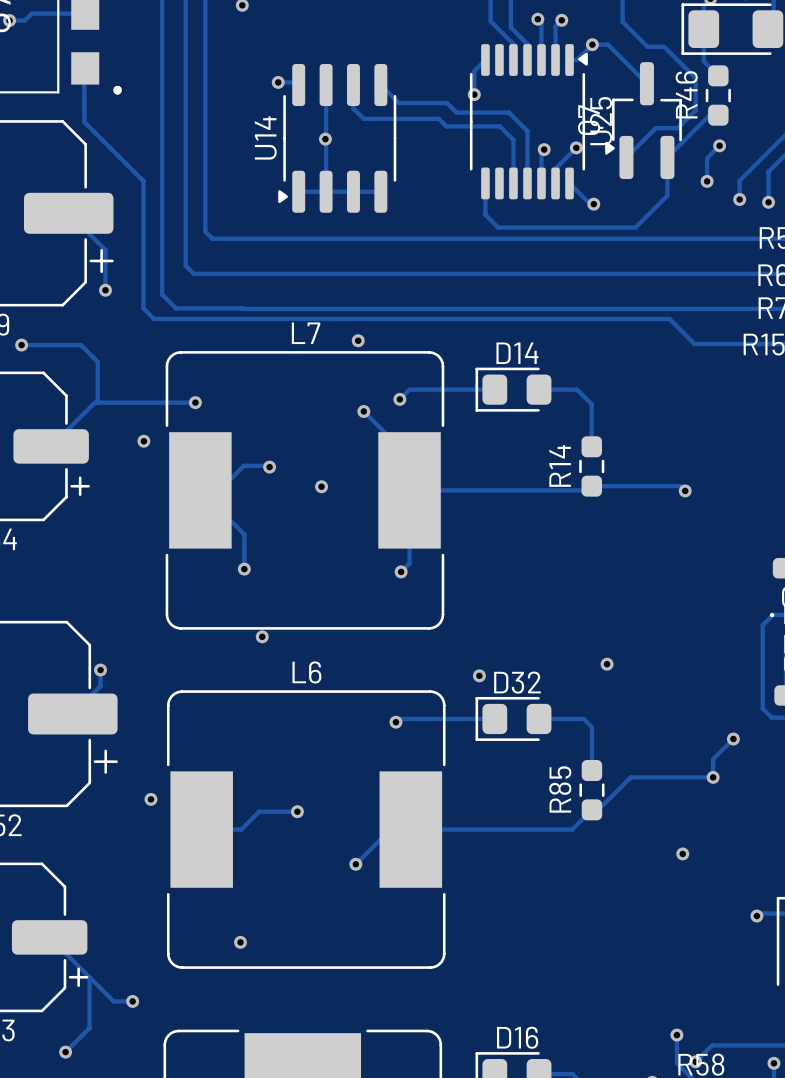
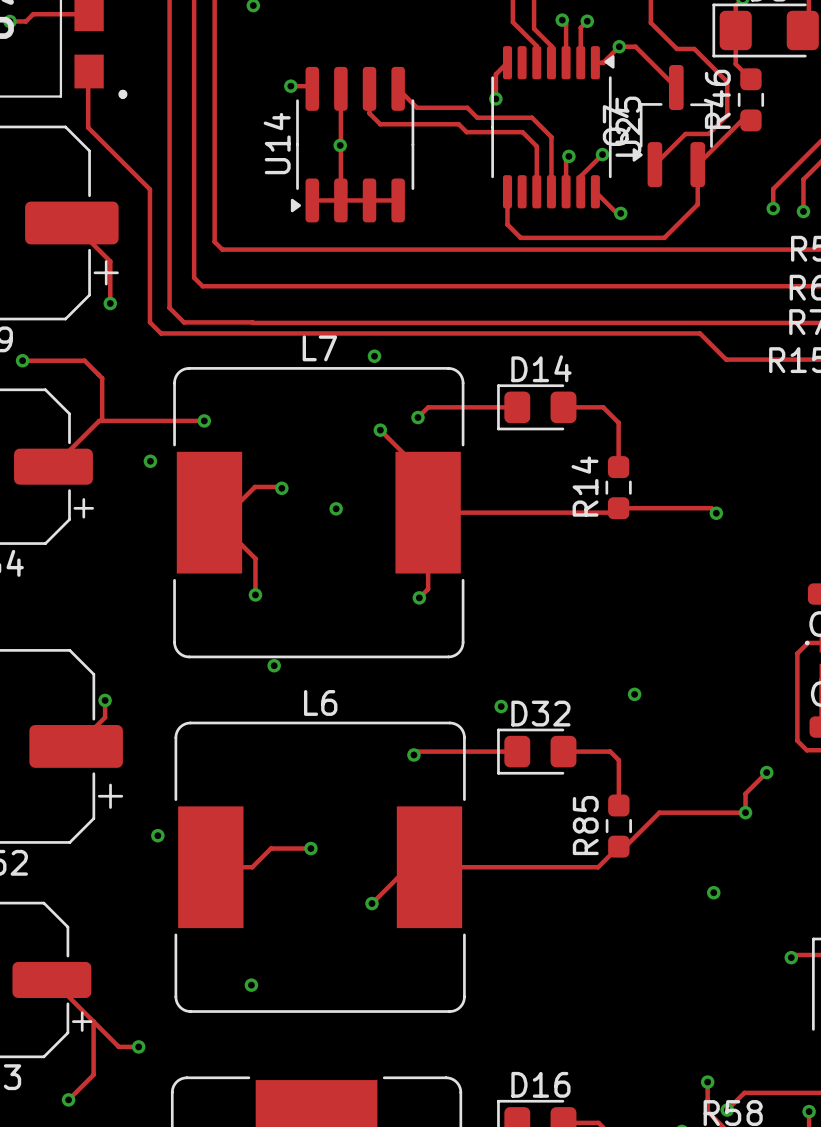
track: (719, 145) (707, 158) (707, 181) -> none
via: (719, 145) -> none
via: (707, 181) -> none

